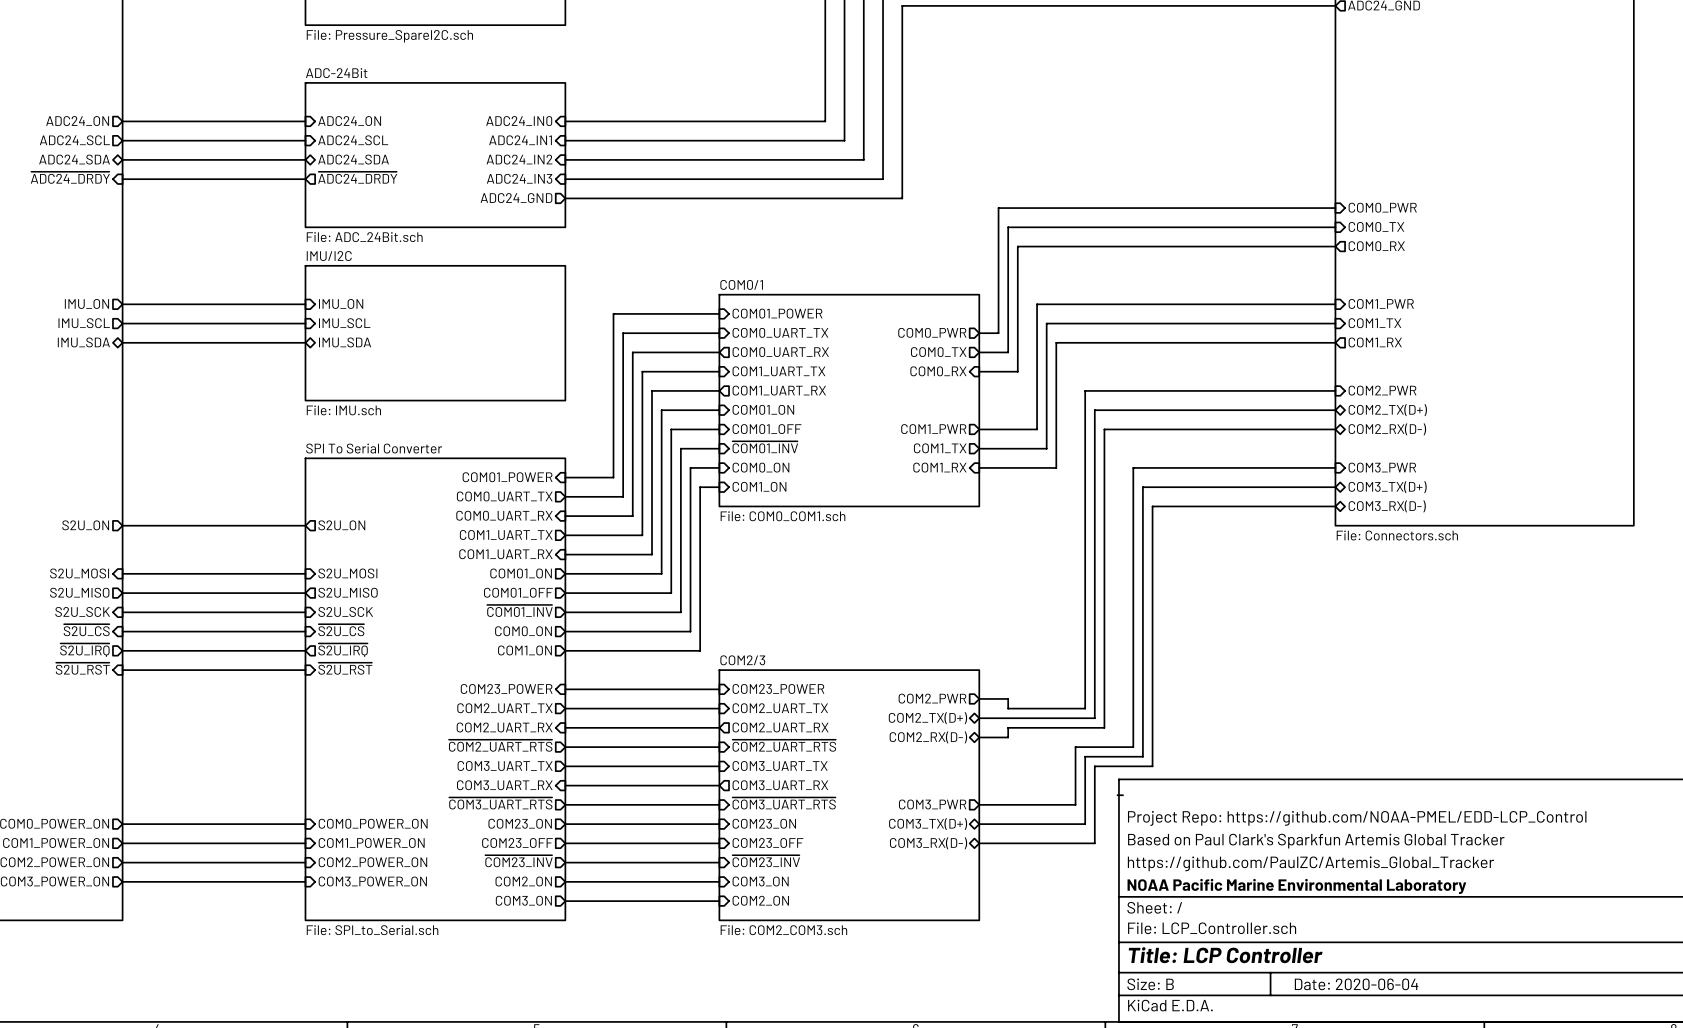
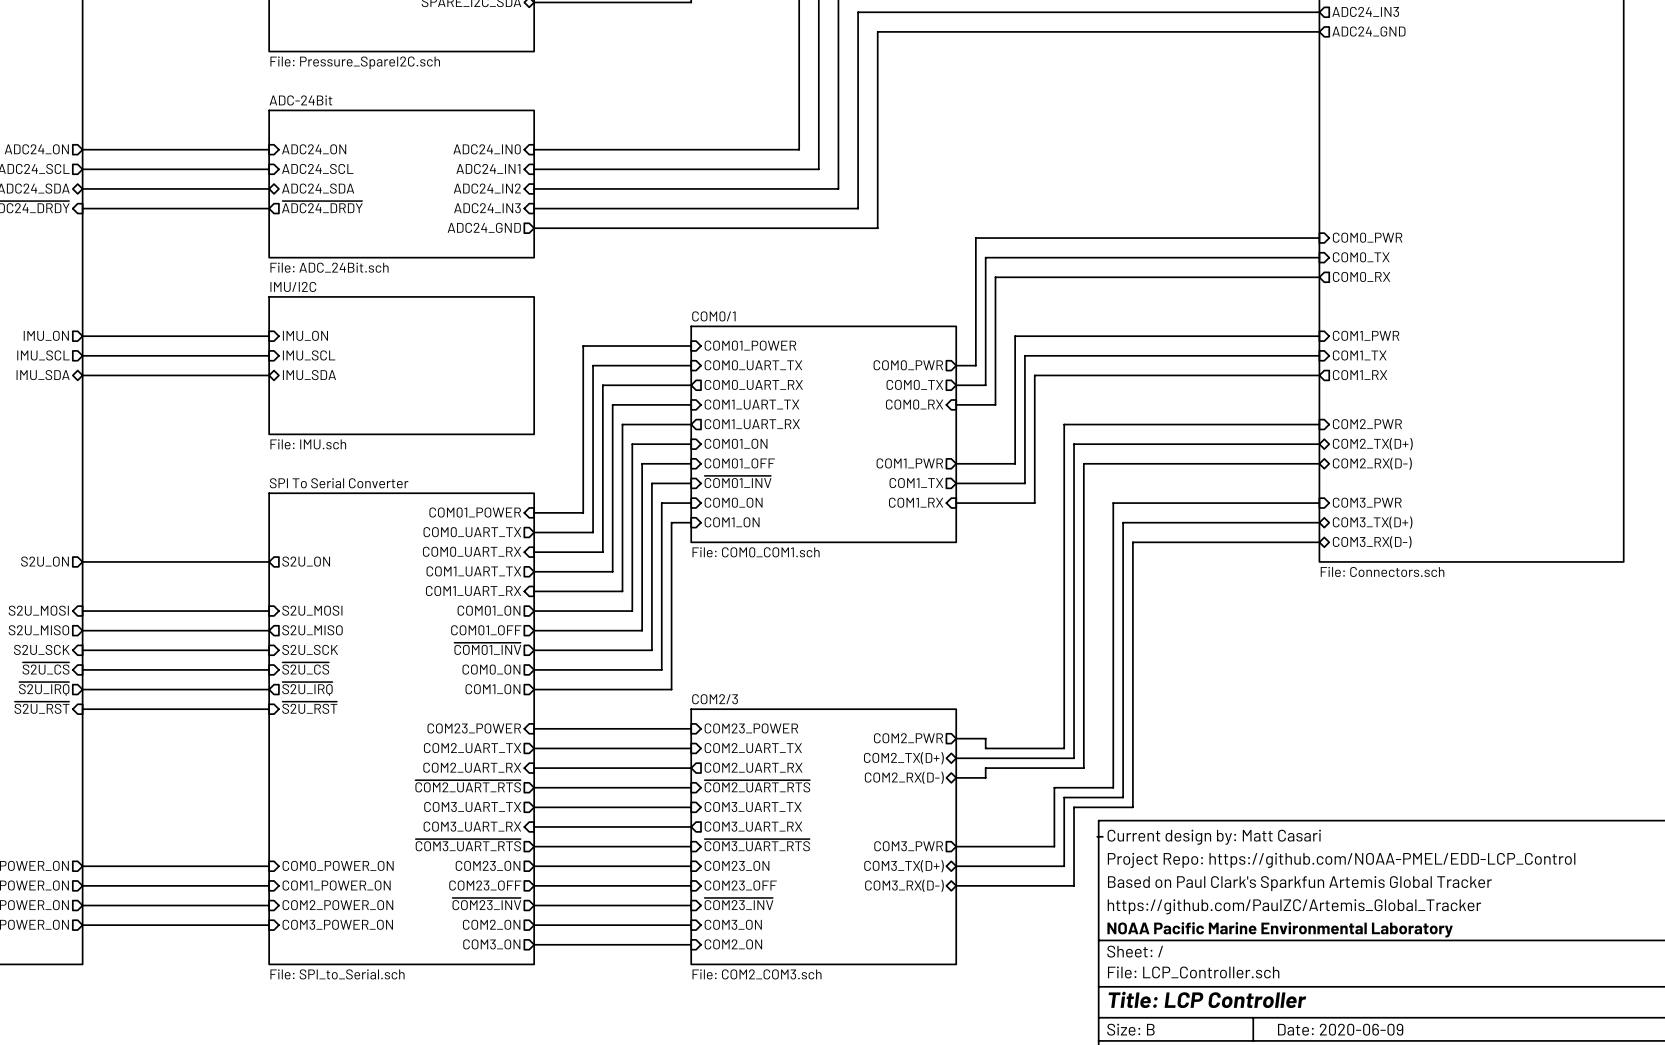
title block: none -> Current design by: Matt Casari (1214, 837)
title block: Date: 2020-06-04 (1356, 984) -> Date: 2020-06-09 (1340, 1029)

